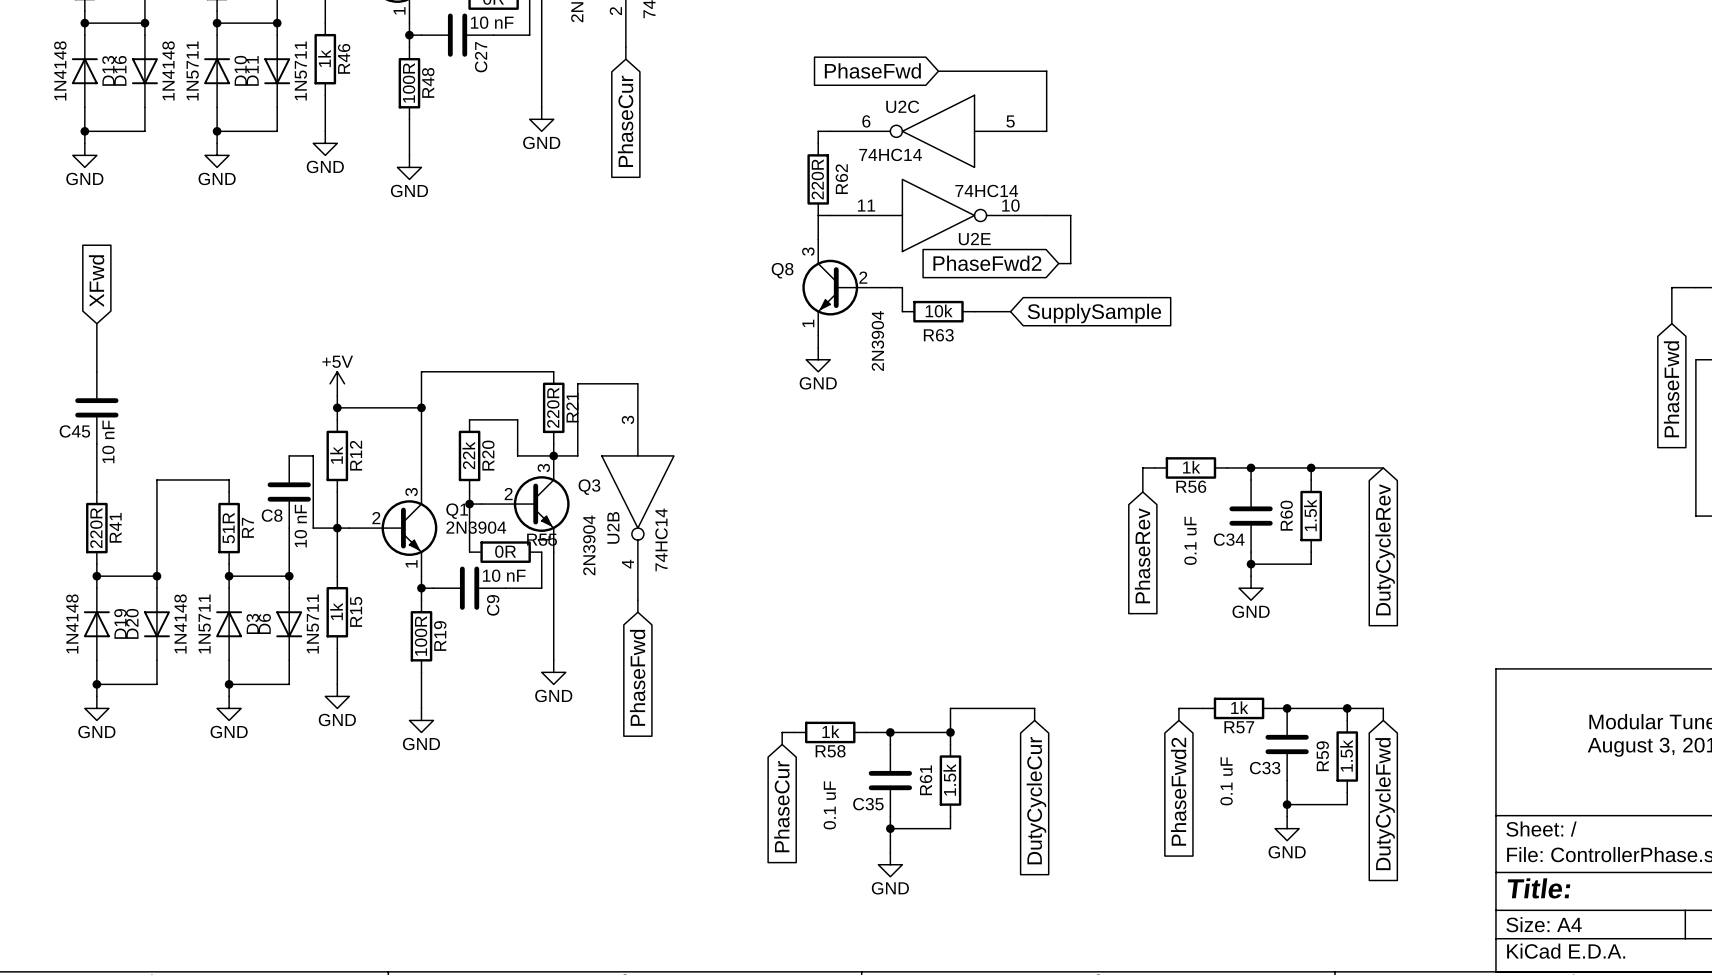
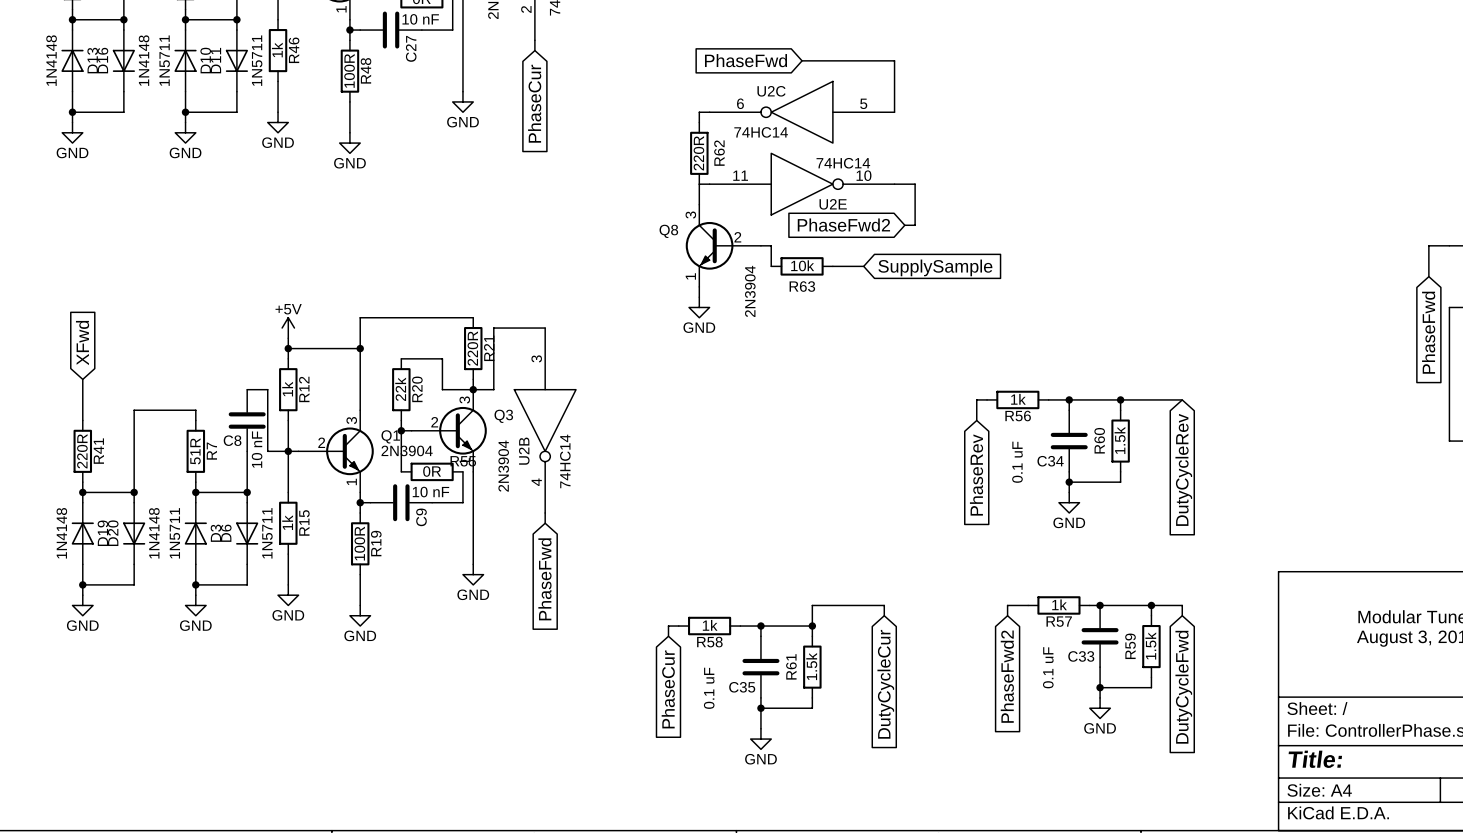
global label position: XFwd (96, 281) -> XFwd (82, 343)
wire: (96, 323) (96, 371) -> none
C45: 10 nF (96, 407) -> none

